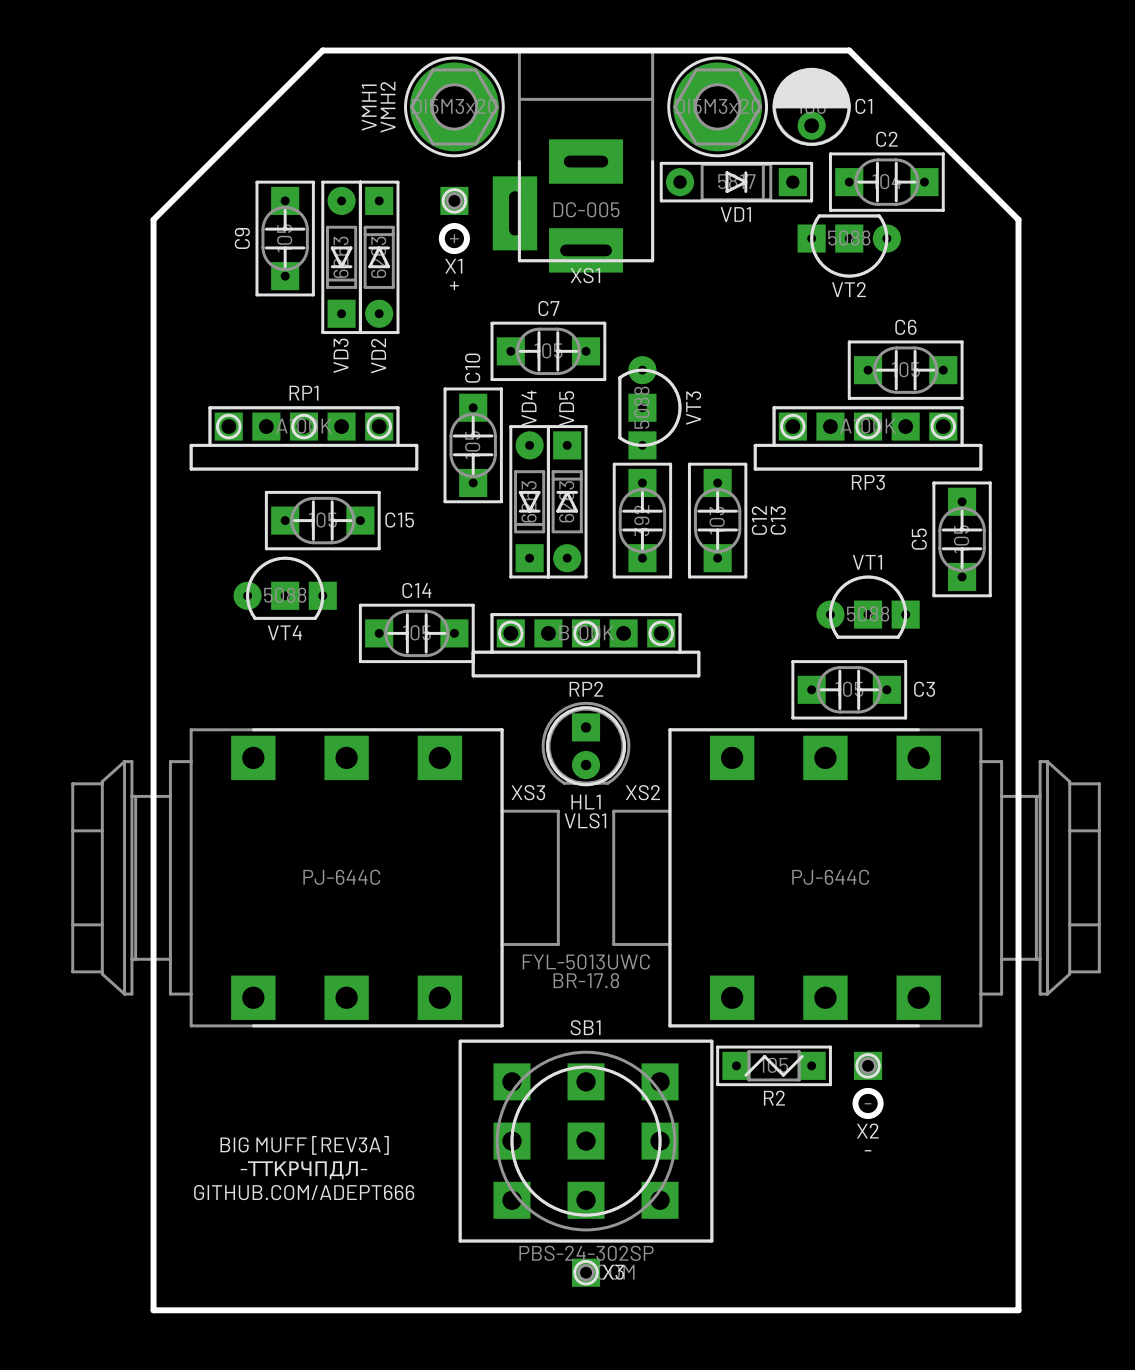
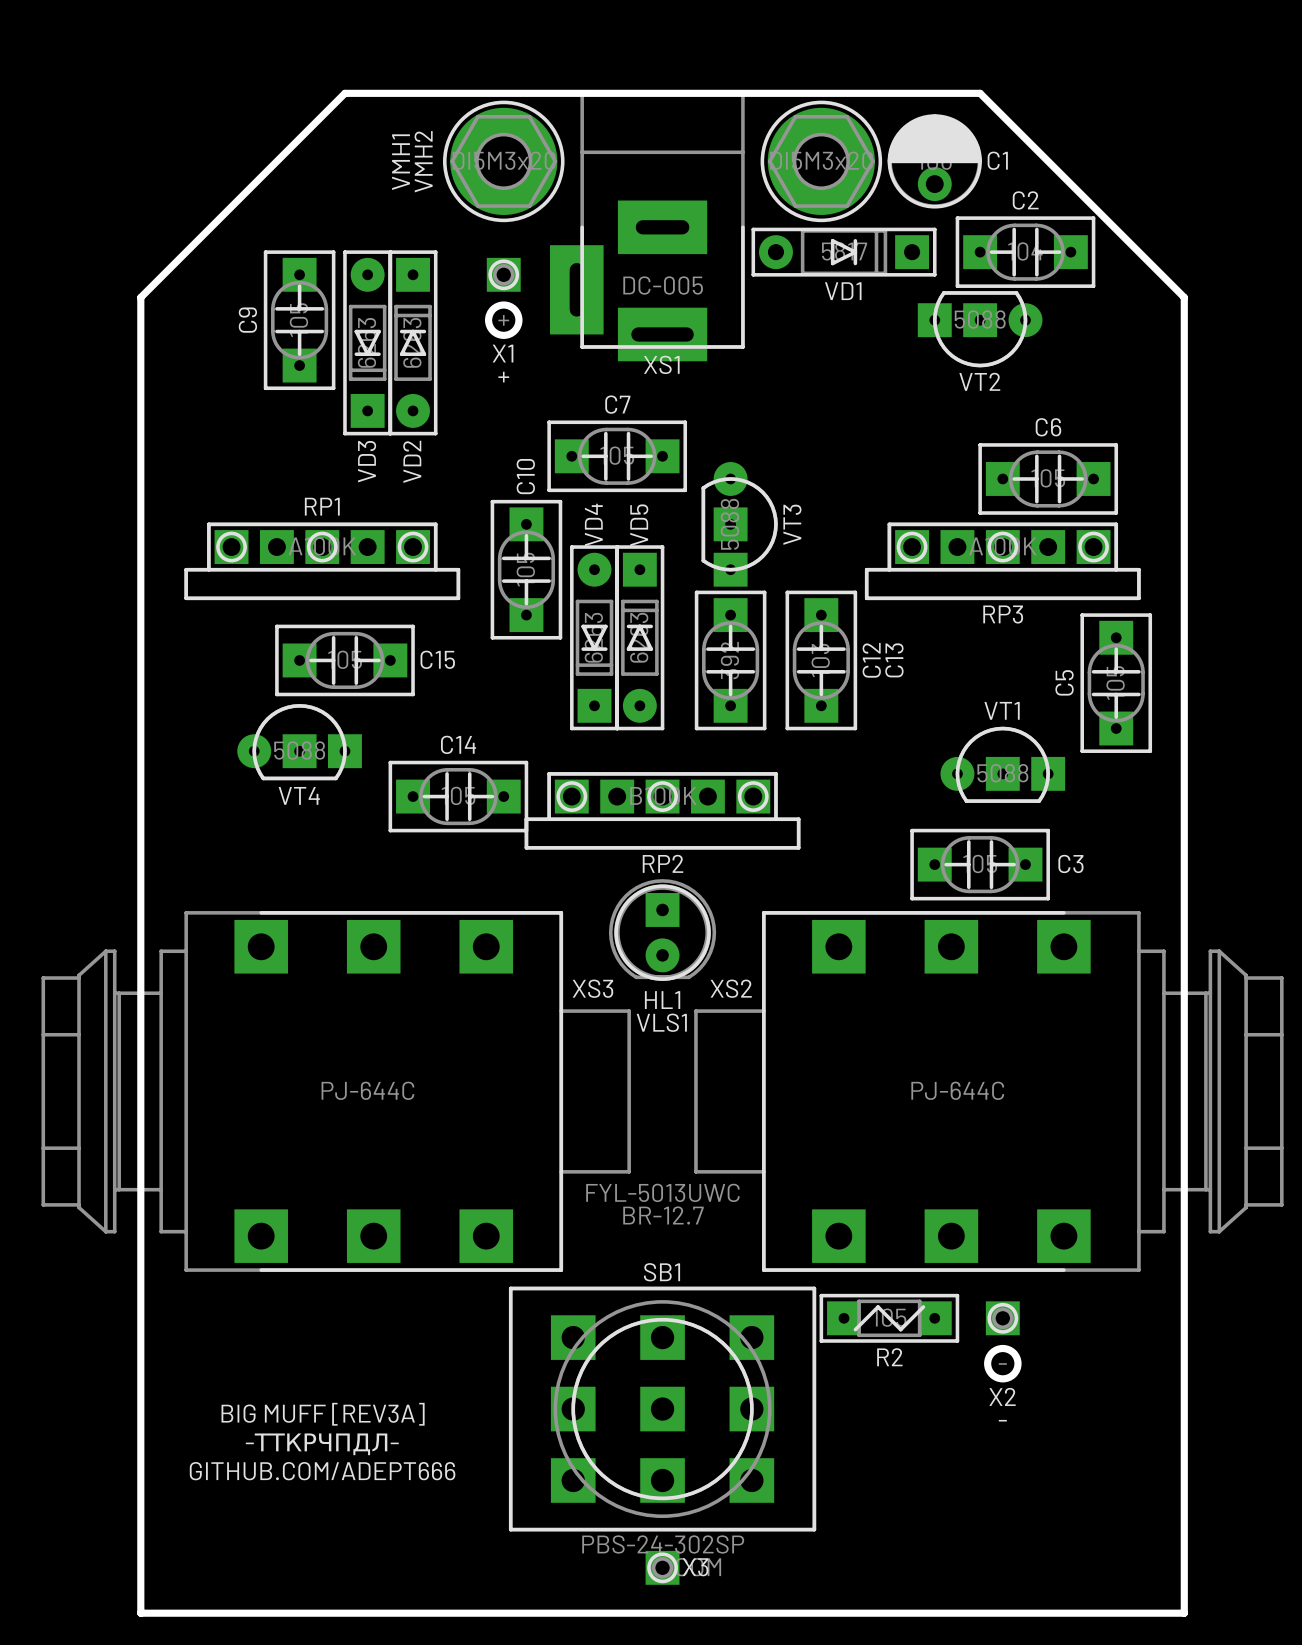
VLS1 value: BR-17.8 (586, 980) -> BR-12.7 (663, 1215)

